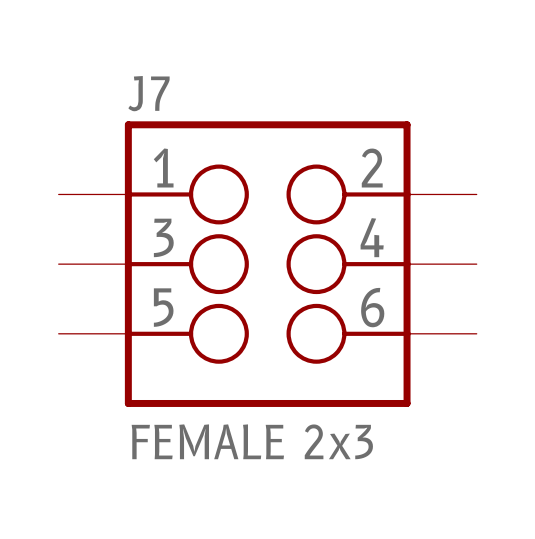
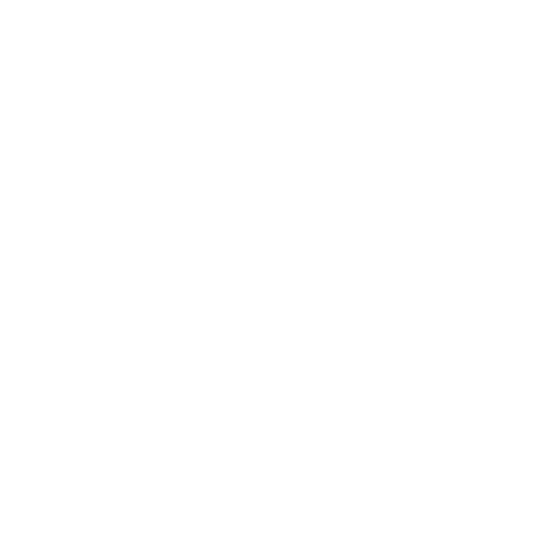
J7: FEMALE 2x3 (267, 264) -> none

